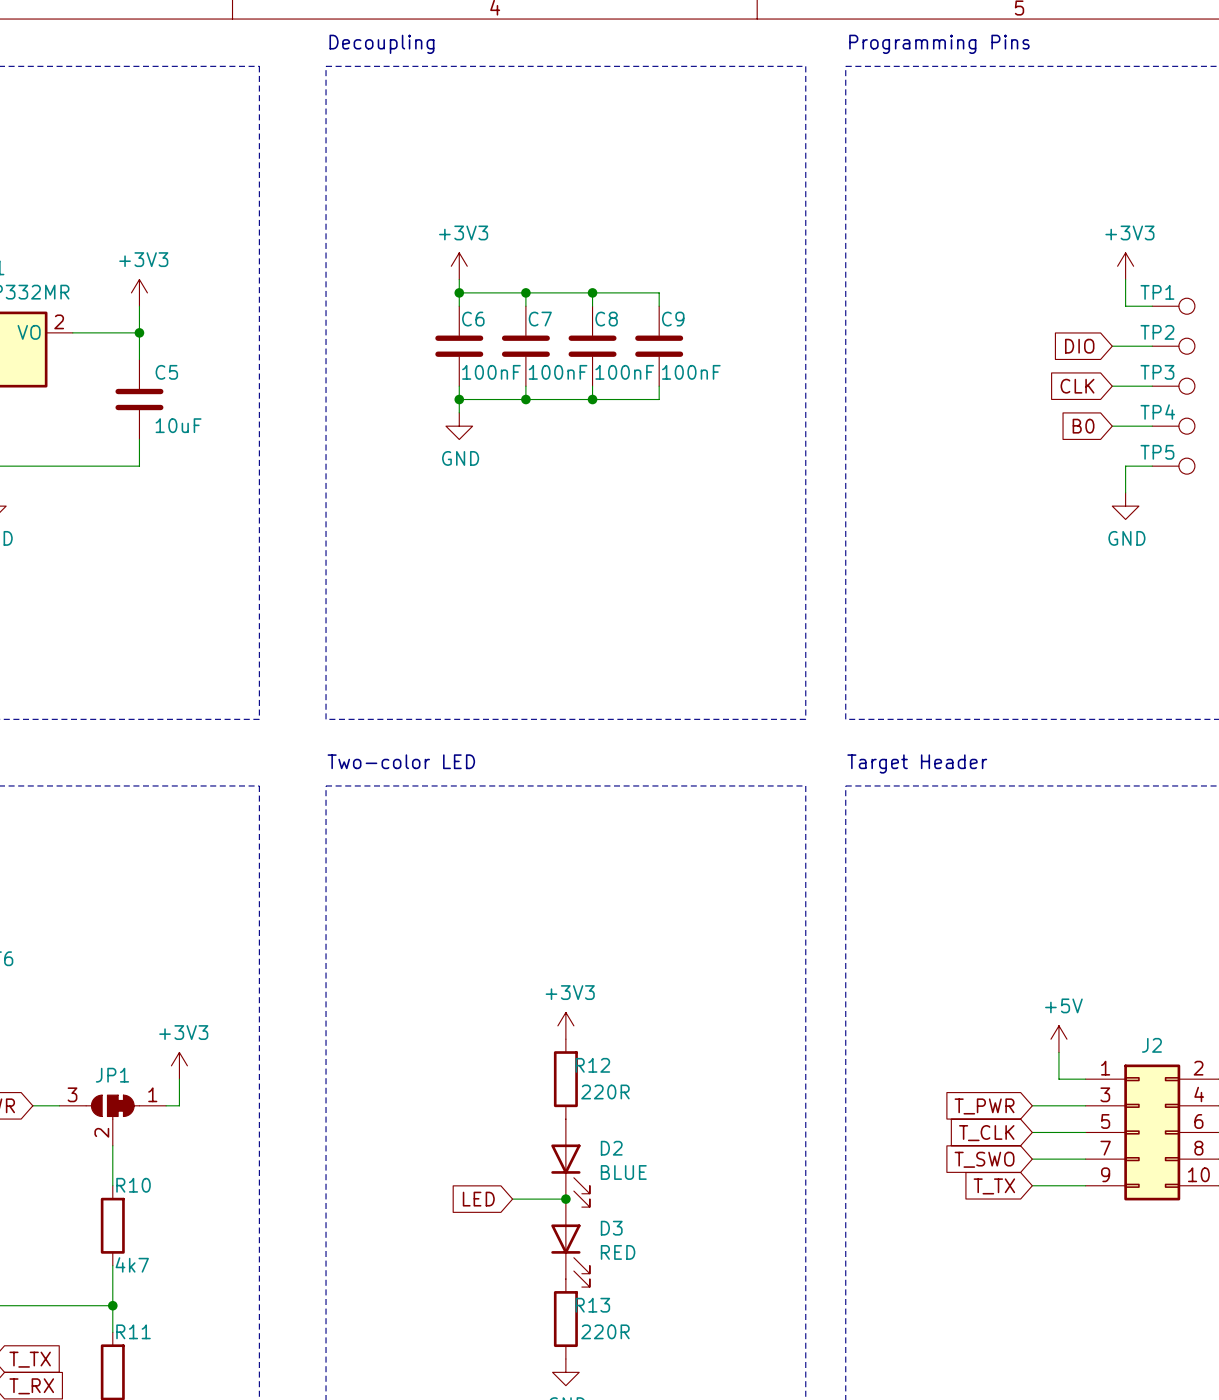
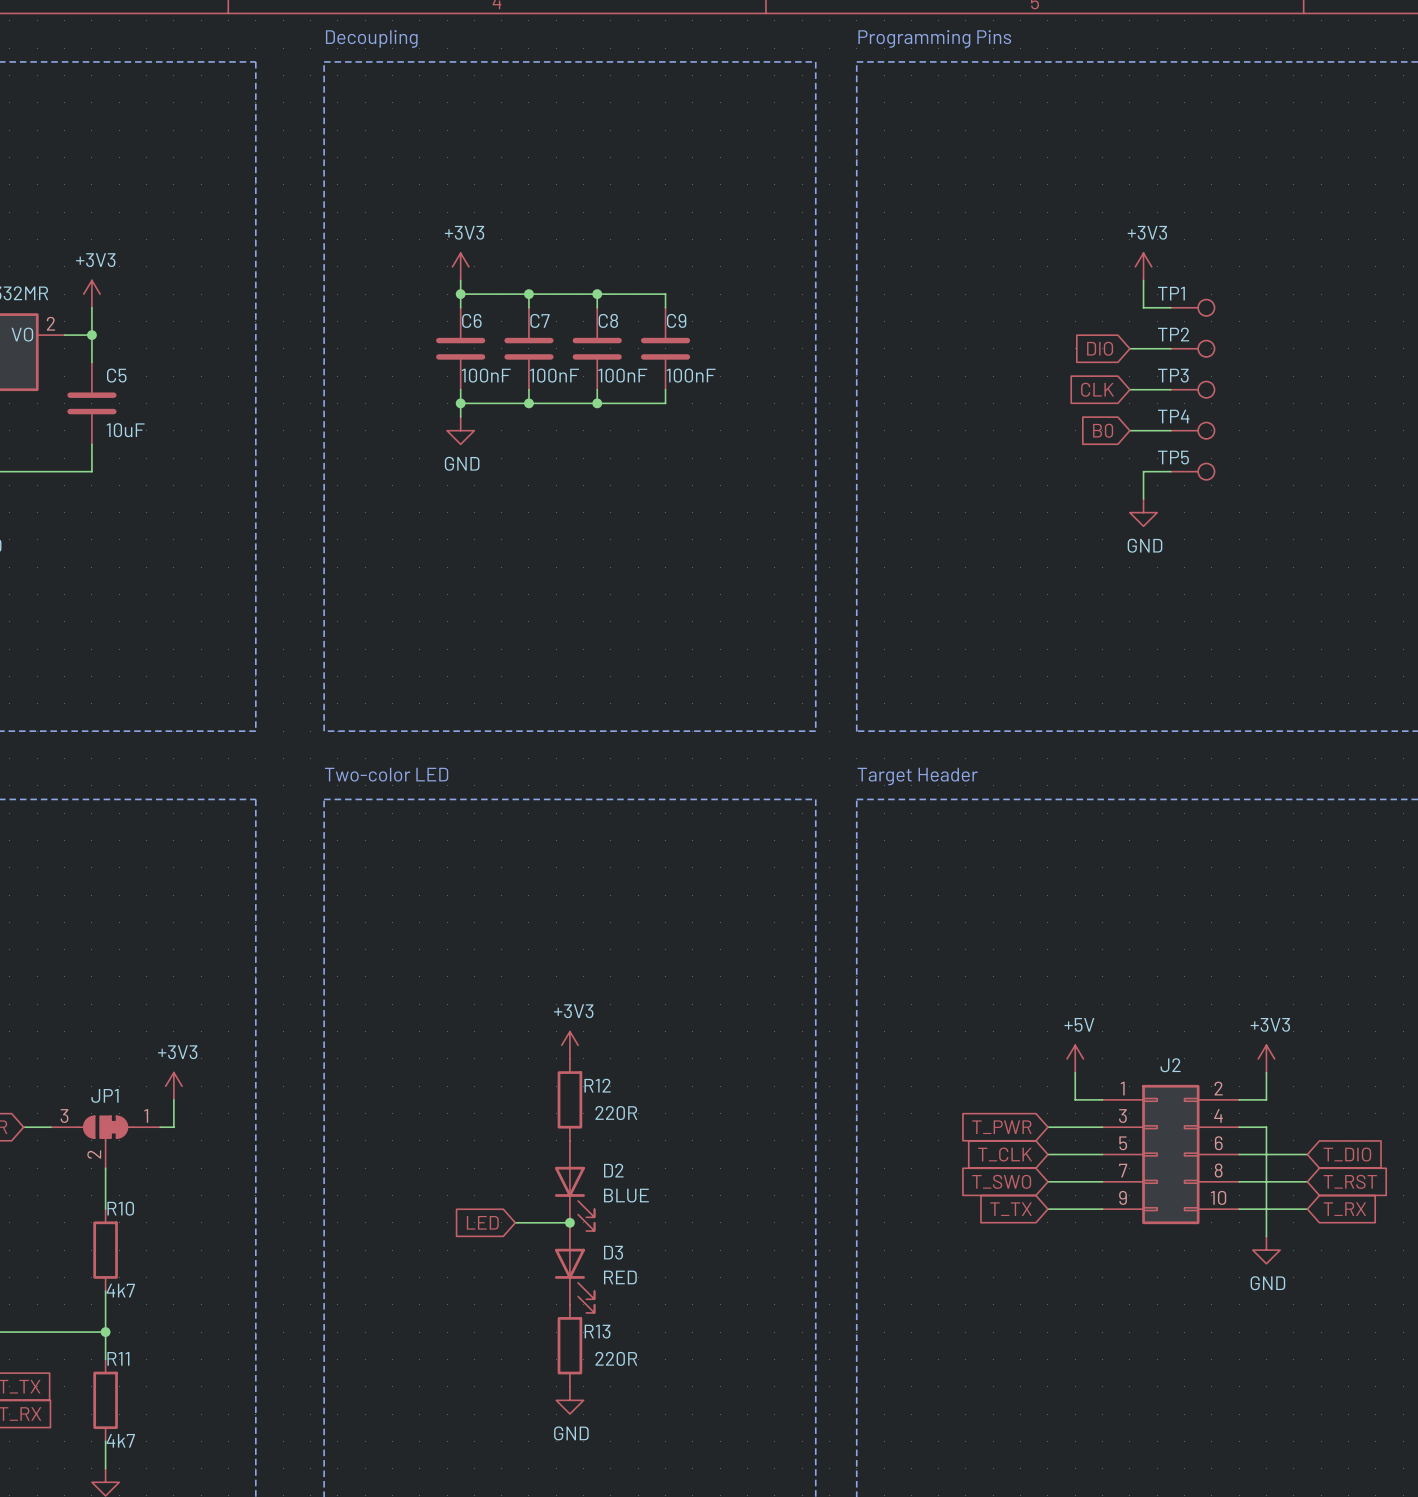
power symbol position: +3V3 (139, 292) -> +3V3 (91, 294)
wire: (139, 306) (139, 359) -> (91, 307) (91, 362)
wire: (99, 332) (139, 332) -> none
junction position: (139, 332) -> (91, 335)
C5 position: (139, 399) -> (91, 403)
wire: (139, 439) (139, 466) (99, 466) -> (91, 444) (91, 471)

